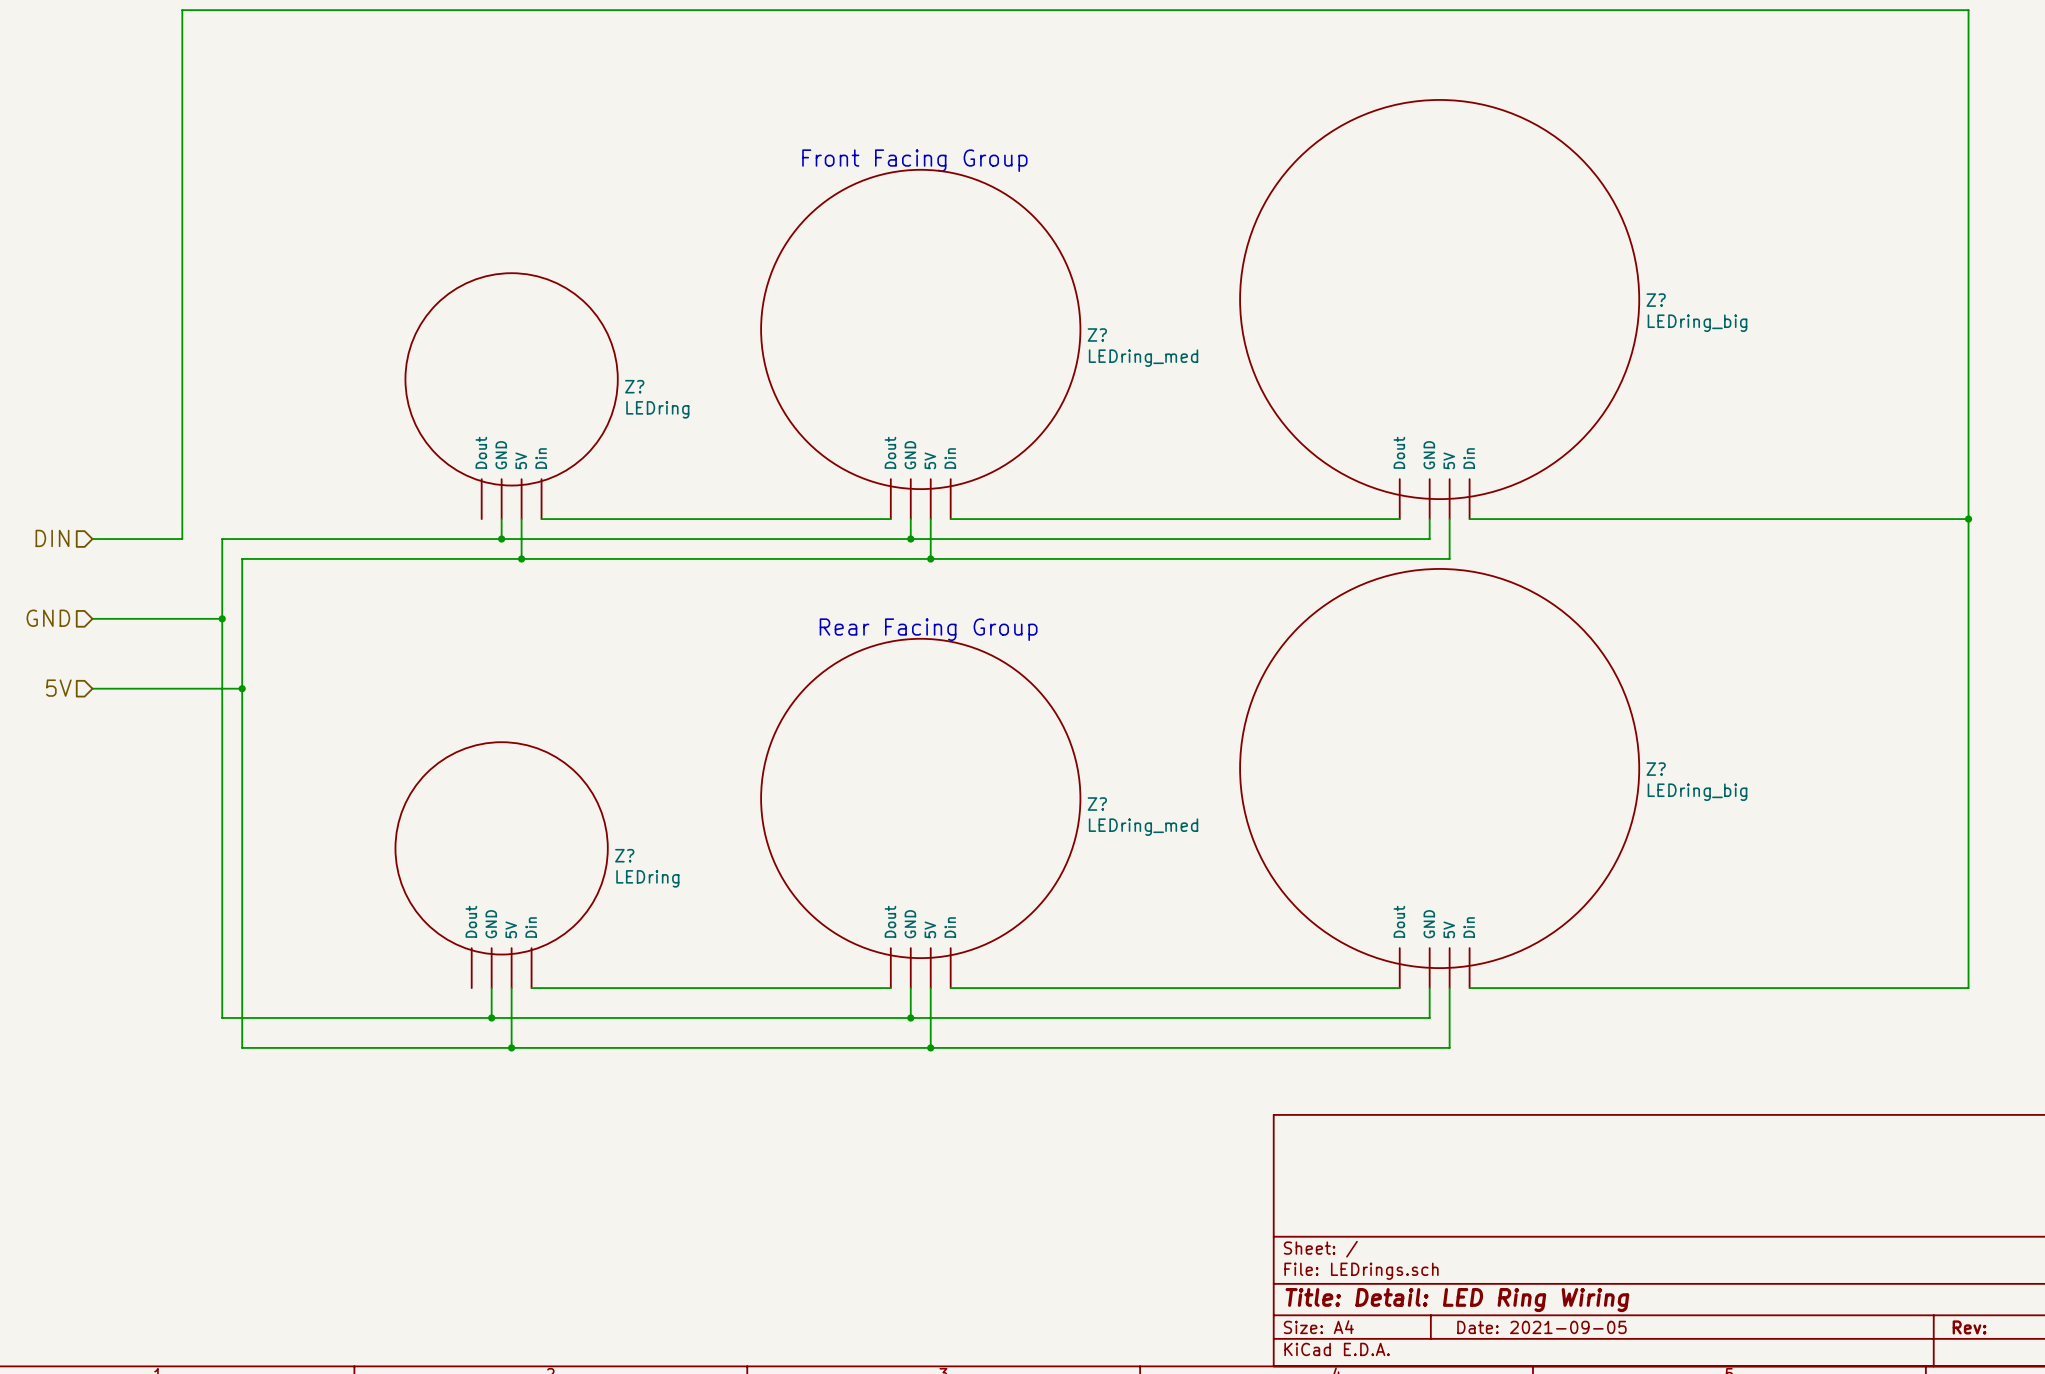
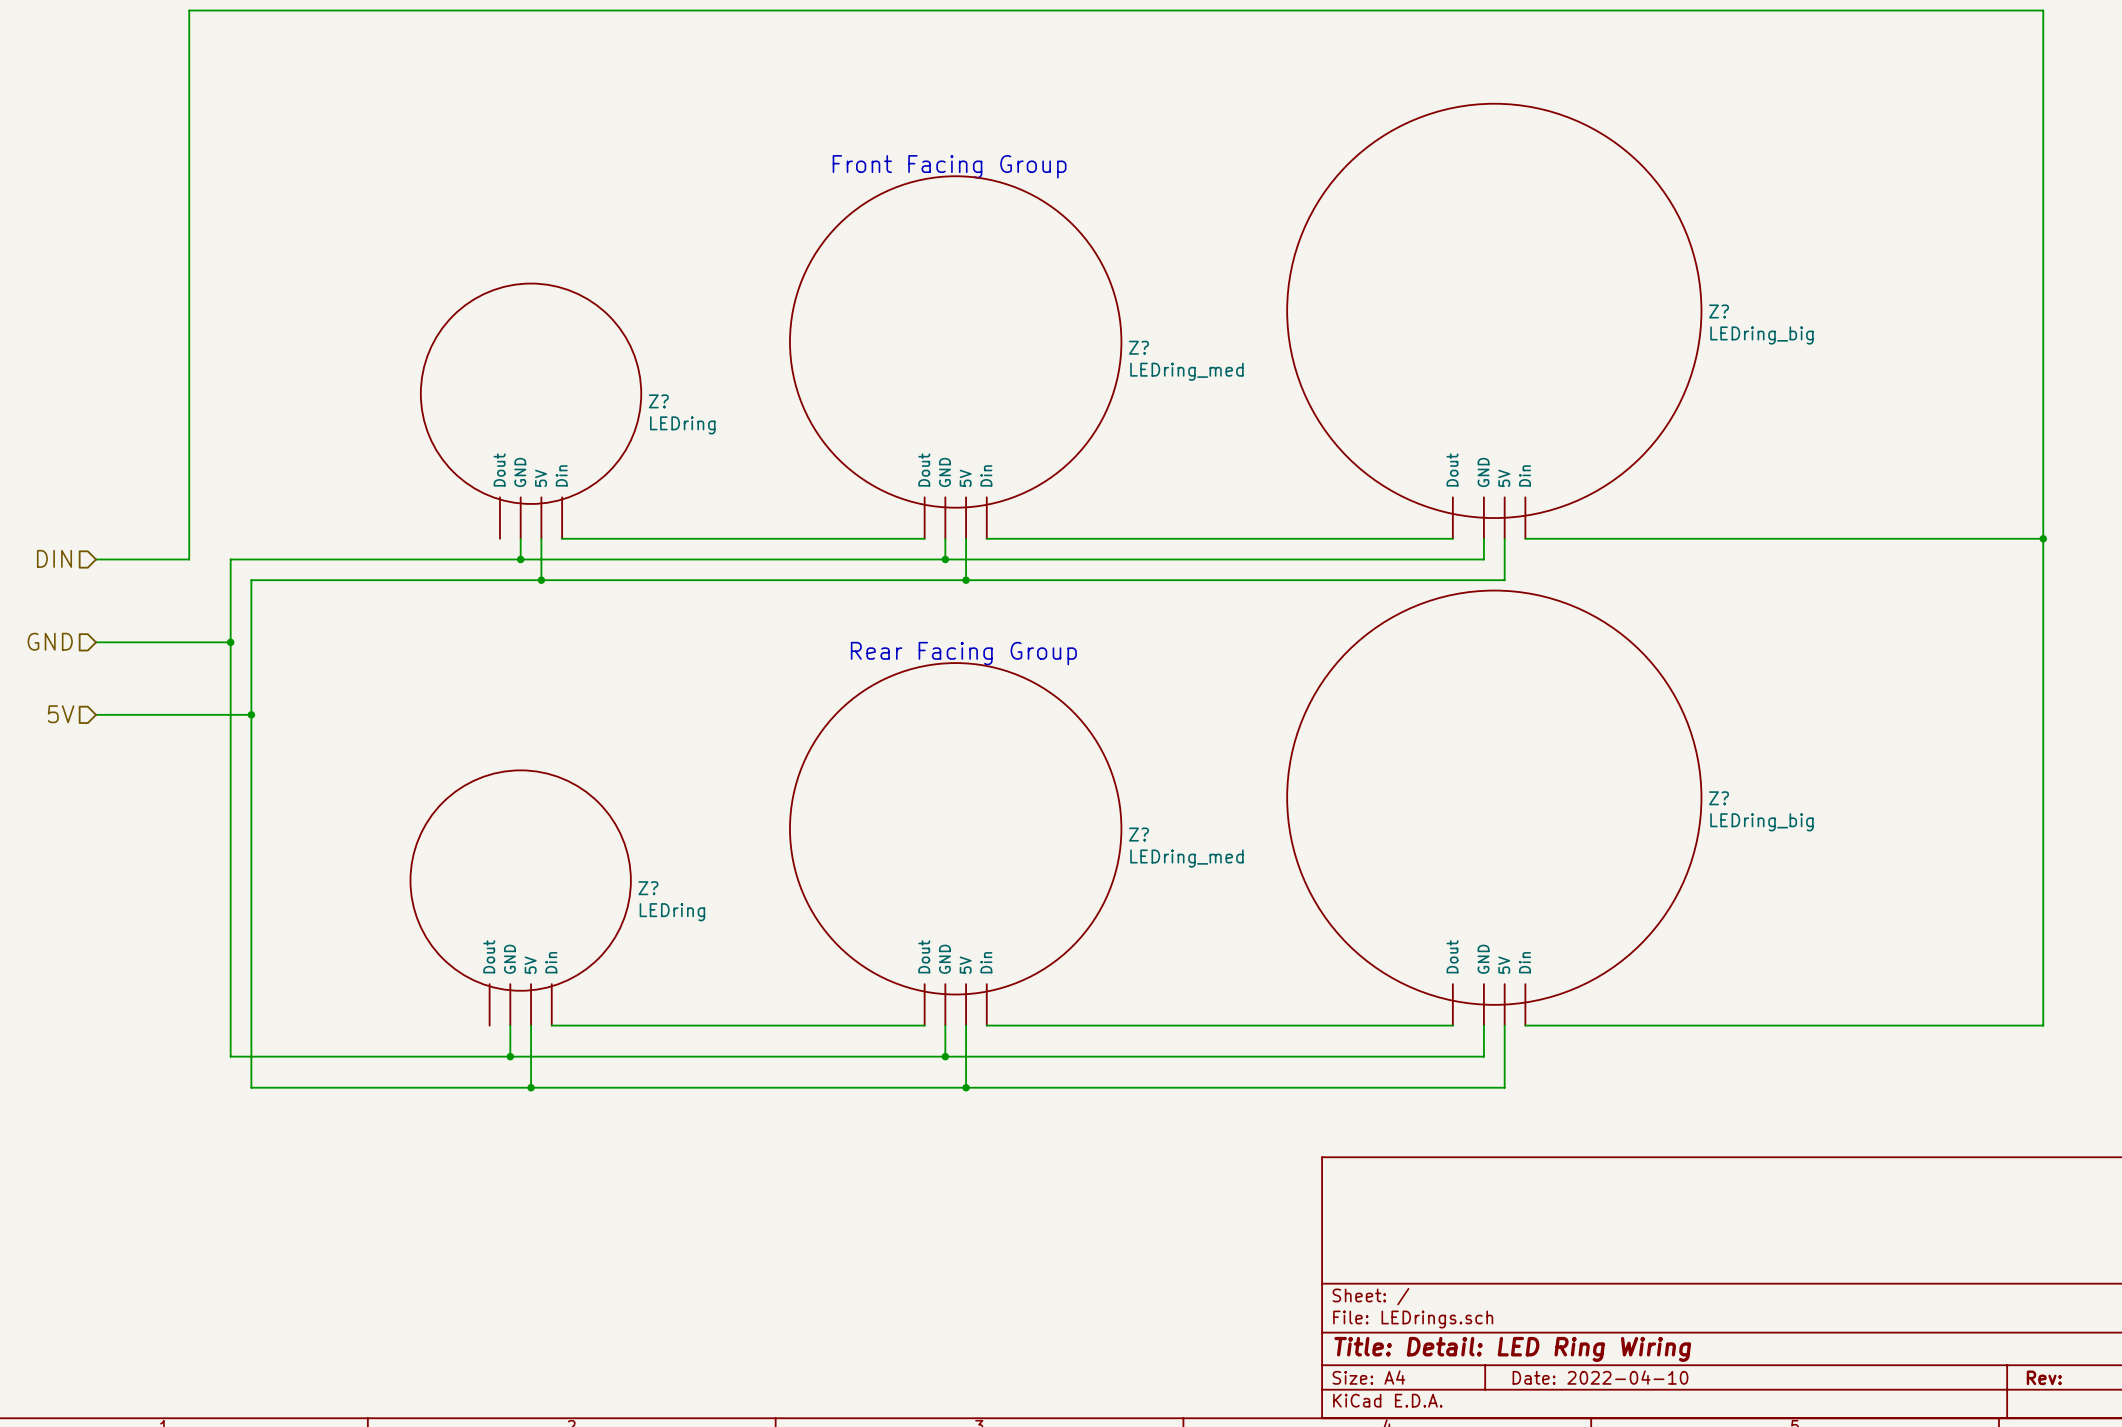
title block: Date: 2021-09-05 (1541, 1327) -> Date: 2022-04-10 (1600, 1377)

